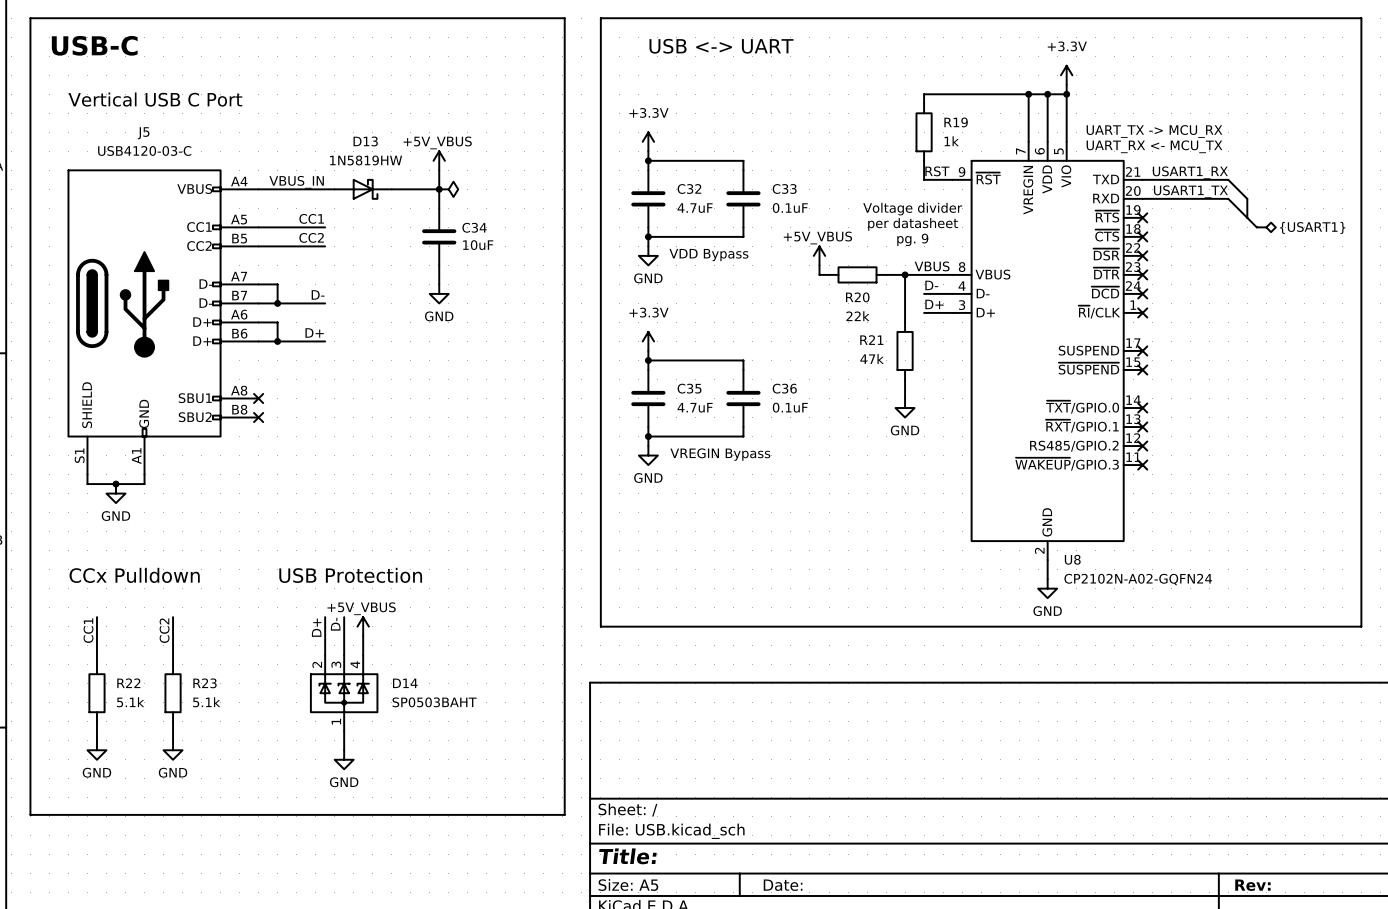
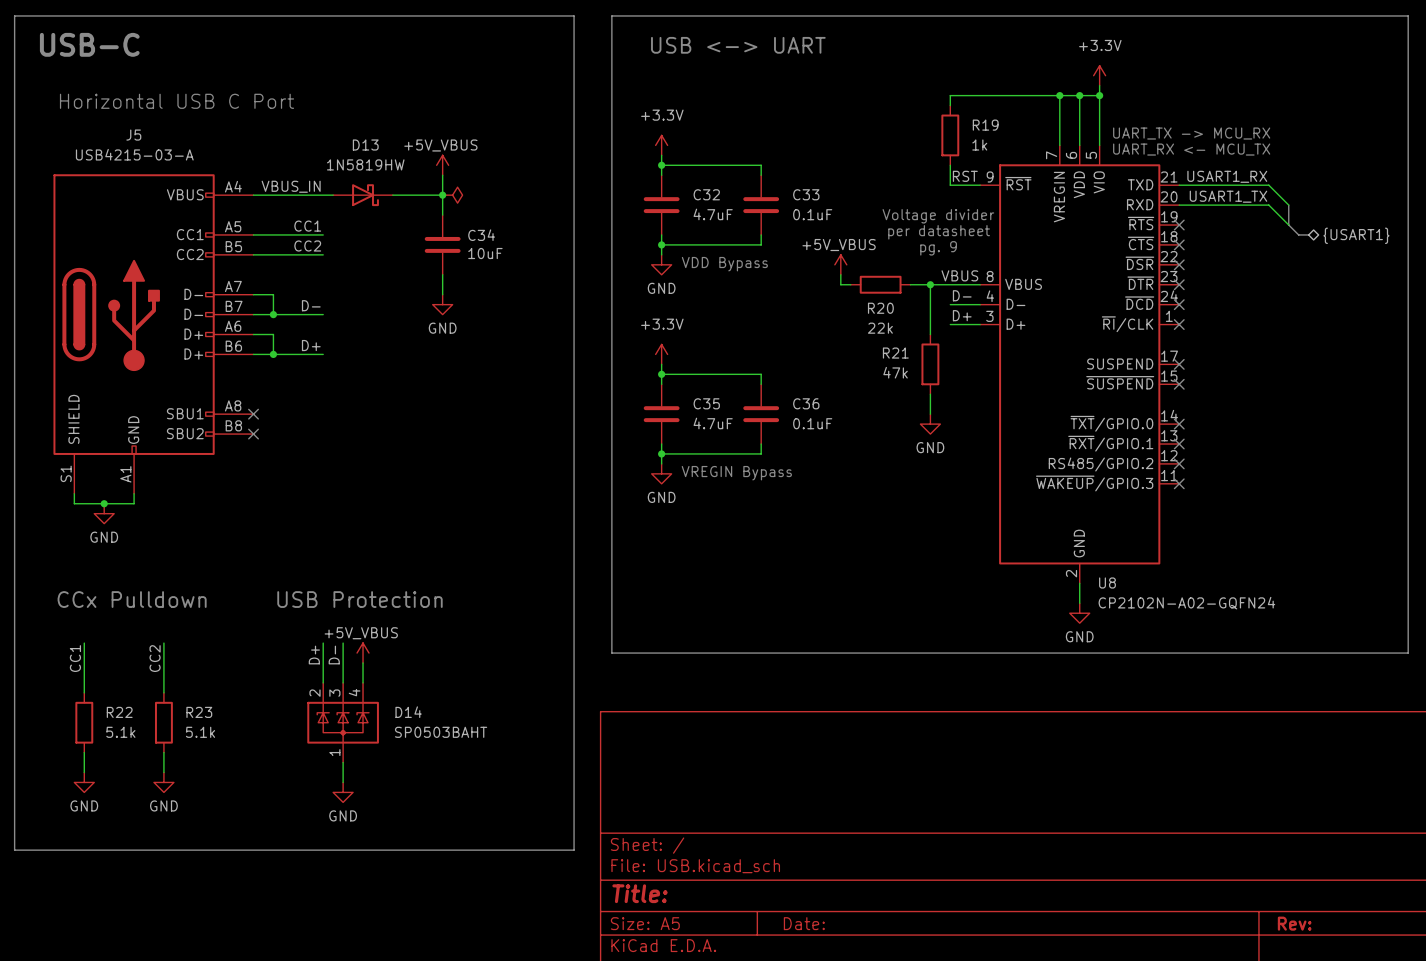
text: Vertical USB C Port (155, 99) -> Horizontal USB C Port (177, 101)
J5 value: USB4120-03-C (144, 150) -> USB4215-03-A (134, 154)

